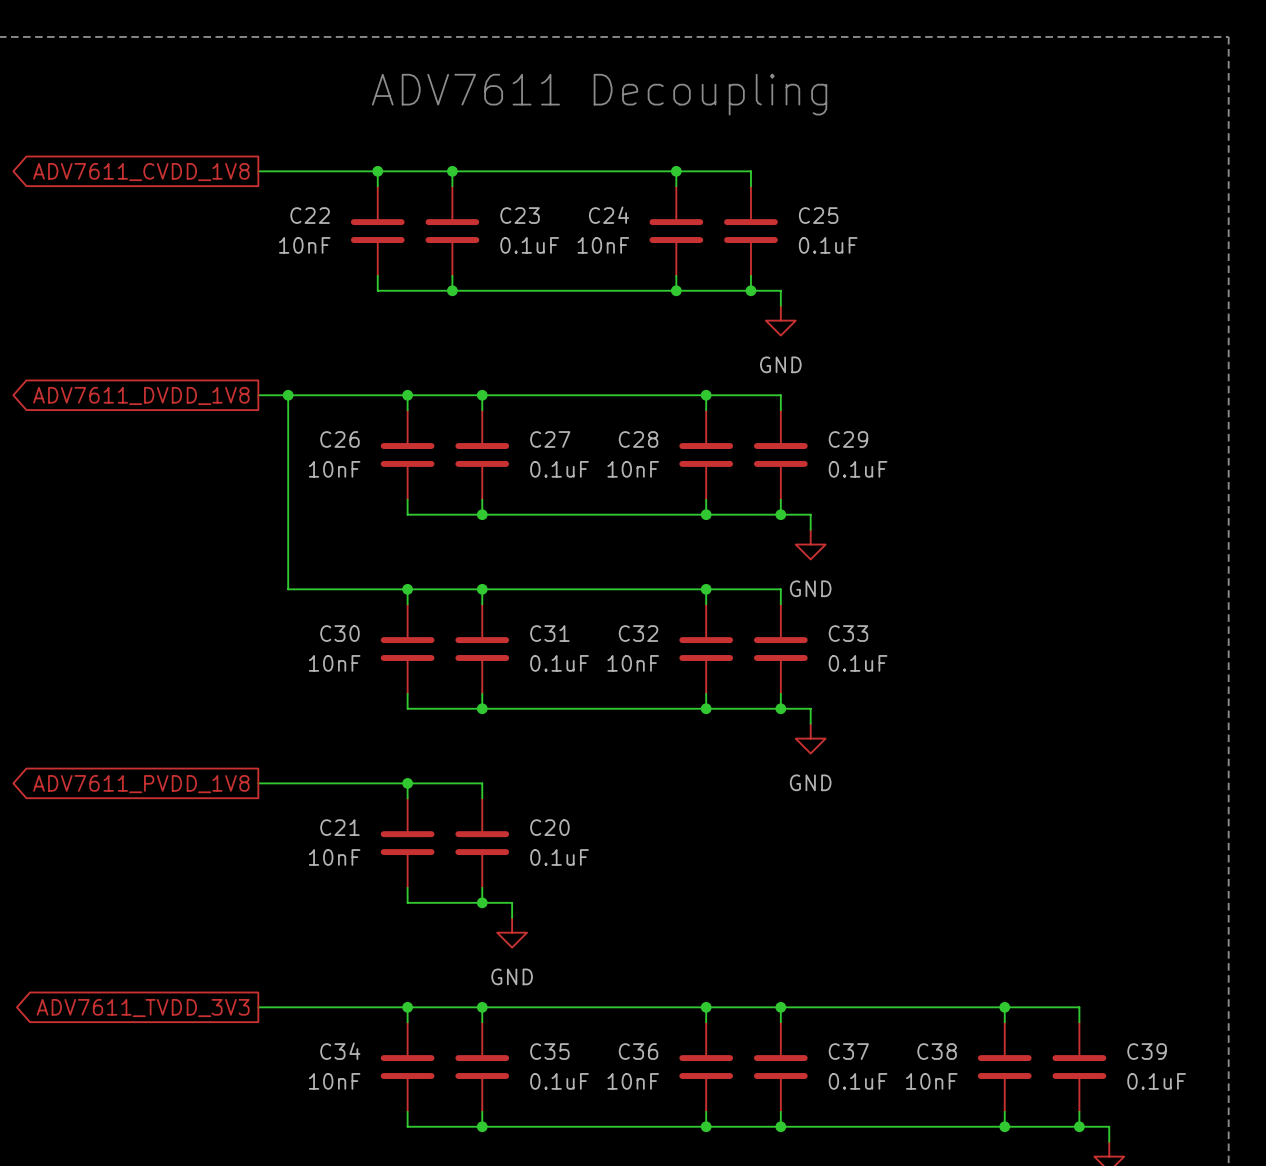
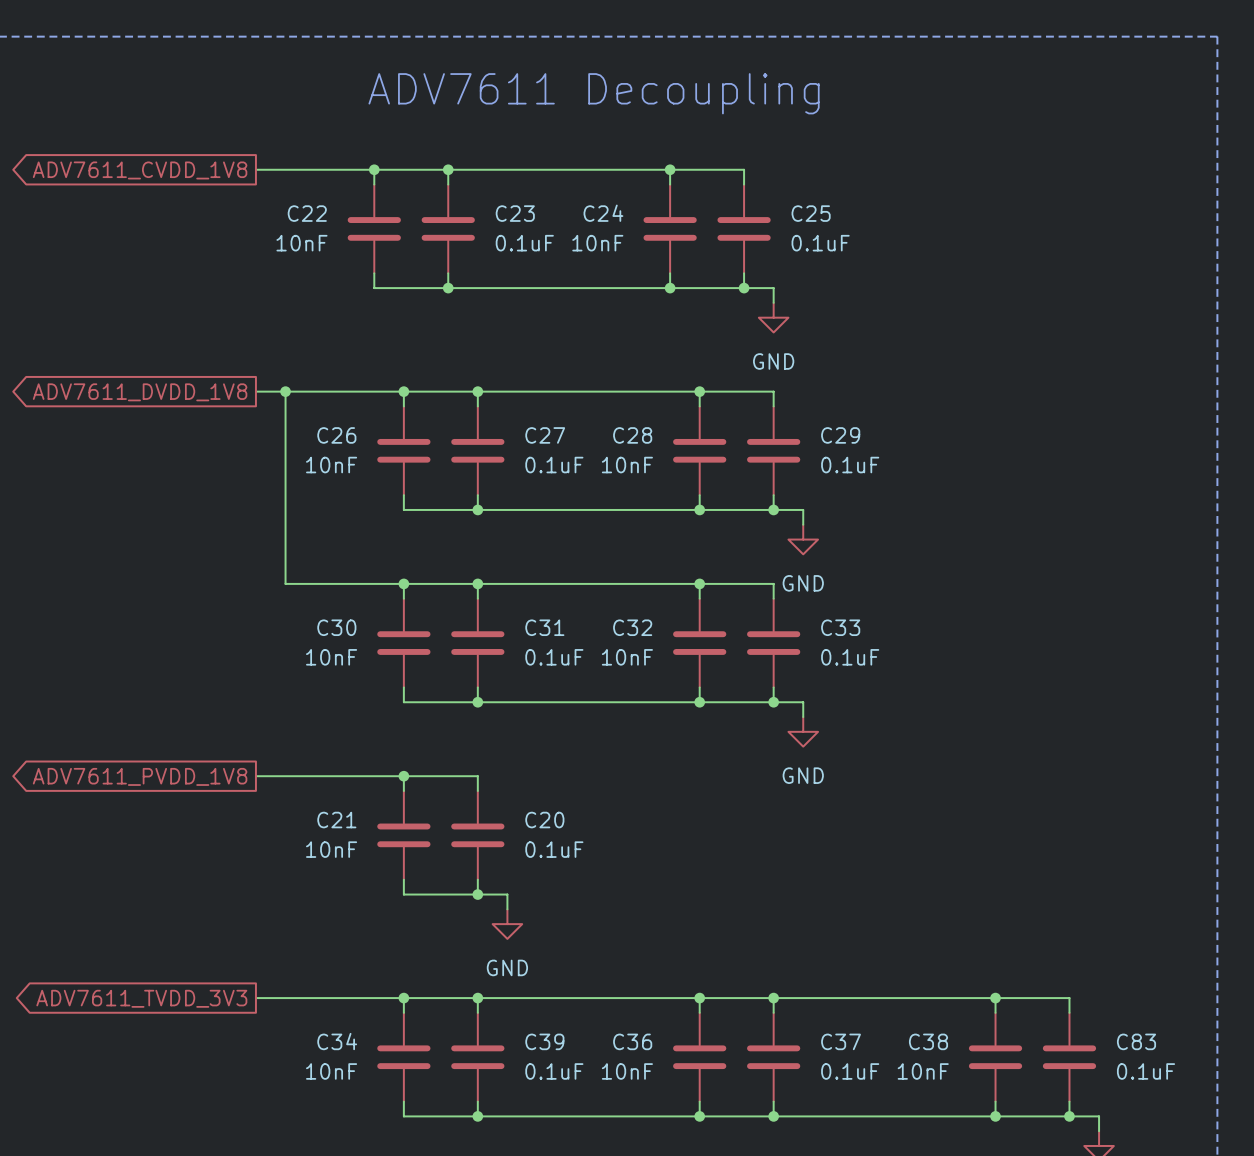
C35 name: C35 (549, 1051) -> C39 (544, 1041)
C39 name: C39 (1147, 1051) -> C83 (1136, 1041)

